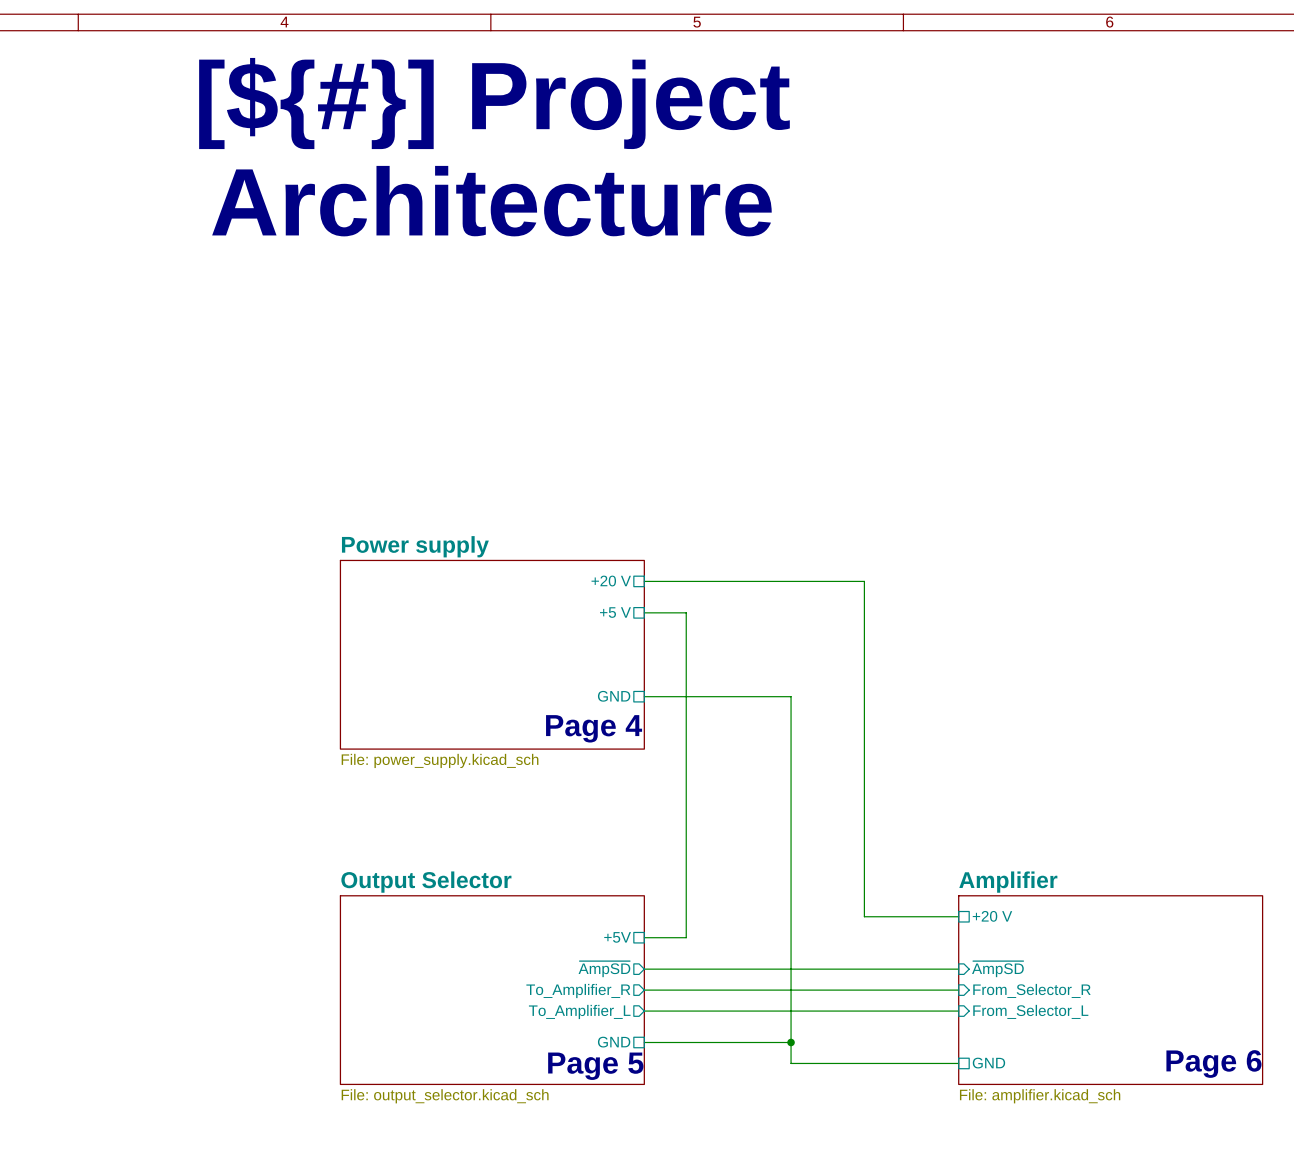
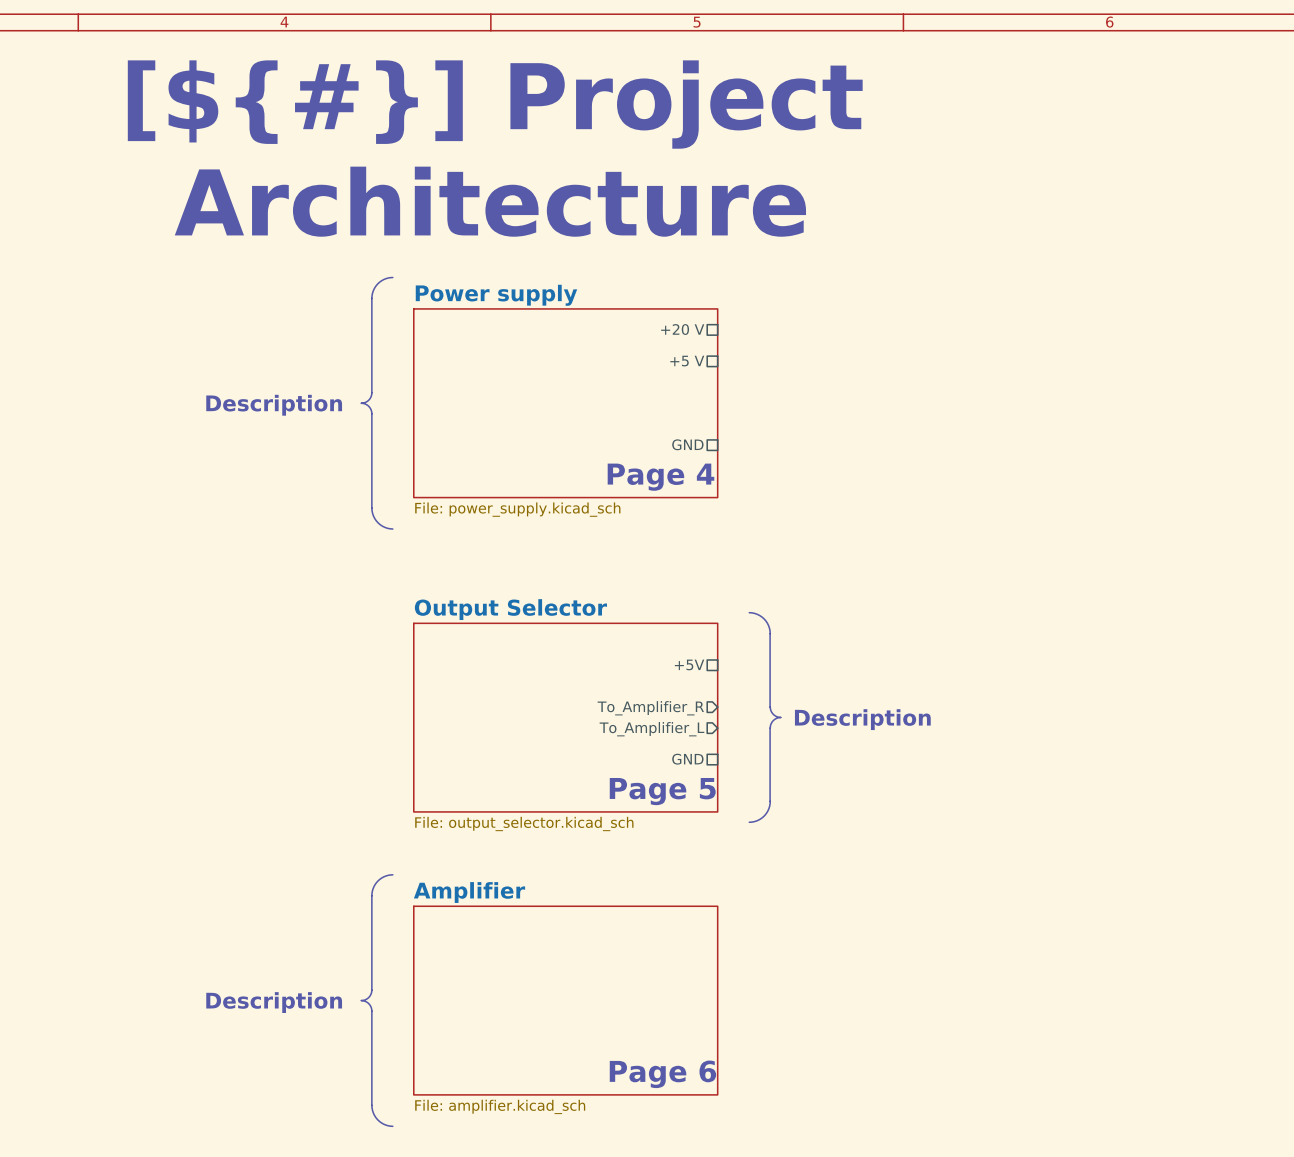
line: none -> (392, 277) (379, 282) (372, 293) (371, 394) (367, 401) (361, 403) (367, 405) (371, 412) (372, 513) (380, 524) (392, 529)
sheet pin: none -> +20 V (682, 329)
sheet pin: none -> +5 V (687, 361)
sheet Power supply: none -> File: power_supply.kicad_sch (565, 403)
text: none -> Description (274, 405)
sheet pin: none -> GND (687, 444)
text: none -> Page 4 (660, 477)
sheet pin: +20 V (611, 581) -> none
wire: (644, 581) (864, 581) (864, 916) (958, 916) -> none
sheet pin: +5 V (615, 612) -> none
wire: (644, 612) (686, 612) (686, 937) (644, 937) -> none
line: none -> (749, 612) (757, 614) (764, 618) (768, 625) (770, 633)
line: none -> (770, 633) (770, 707)
sheet Power supply: File: power_supply.kicad_sch (492, 654) -> none
sheet pin: none -> +5V (689, 664)
sheet pin position: GND (614, 696) -> GND (687, 759)
wire: (644, 696) (791, 696) (791, 1063) (958, 1063) -> none
line: none -> (770, 707) (773, 714) (780, 717) (773, 720) (770, 727)
sheet pin: none -> To_Amplifier_R (650, 708)
sheet Output Selector: none -> File: output_selector.kicad_sch (565, 717)
text: none -> Description (862, 719)
text: Page 4 (594, 728) -> none
line: none -> (770, 728) (770, 801)
sheet pin: none -> To_Amplifier_L (651, 729)
text: none -> Page 5 (662, 791)
line: none -> (770, 801) (769, 808) (764, 816) (758, 820) (749, 822)
line: none -> (392, 874) (379, 879) (372, 891) (371, 991) (367, 998) (361, 1000) (367, 1002) (371, 1009) (372, 1110) (380, 1121) (392, 1126)
sheet pin: +20 V (992, 916) -> none
sheet pin: +5V (617, 937) -> none
sheet pin: ~{AmpSD} (604, 969) -> none
wire: (644, 969) (958, 969) -> none
sheet pin: ~{AmpSD} (997, 969) -> none
sheet Output Selector: File: output_selector.kicad_sch (492, 990) -> none
wire: (644, 990) (958, 990) -> none
sheet pin: From_Selector_R (1031, 990) -> none
sheet Amplifier: File: amplifier.kicad_sch (1110, 990) -> none
sheet pin: To_Amplifier_R (578, 991) -> none
sheet Amplifier: none -> File: amplifier.kicad_sch (565, 1000)
text: none -> Description (274, 1002)
sheet pin: To_Amplifier_L (579, 1011) -> none
wire: (644, 1011) (958, 1011) -> none
sheet pin: From_Selector_L (1030, 1011) -> none
sheet pin: GND (614, 1042) -> none
wire: (644, 1042) (791, 1042) -> none
junction: (791, 1042) -> none
sheet pin: GND (988, 1063) -> none
text: Page 6 (1213, 1063) -> none
text: Page 5 (595, 1066) -> Page 6 (662, 1074)

